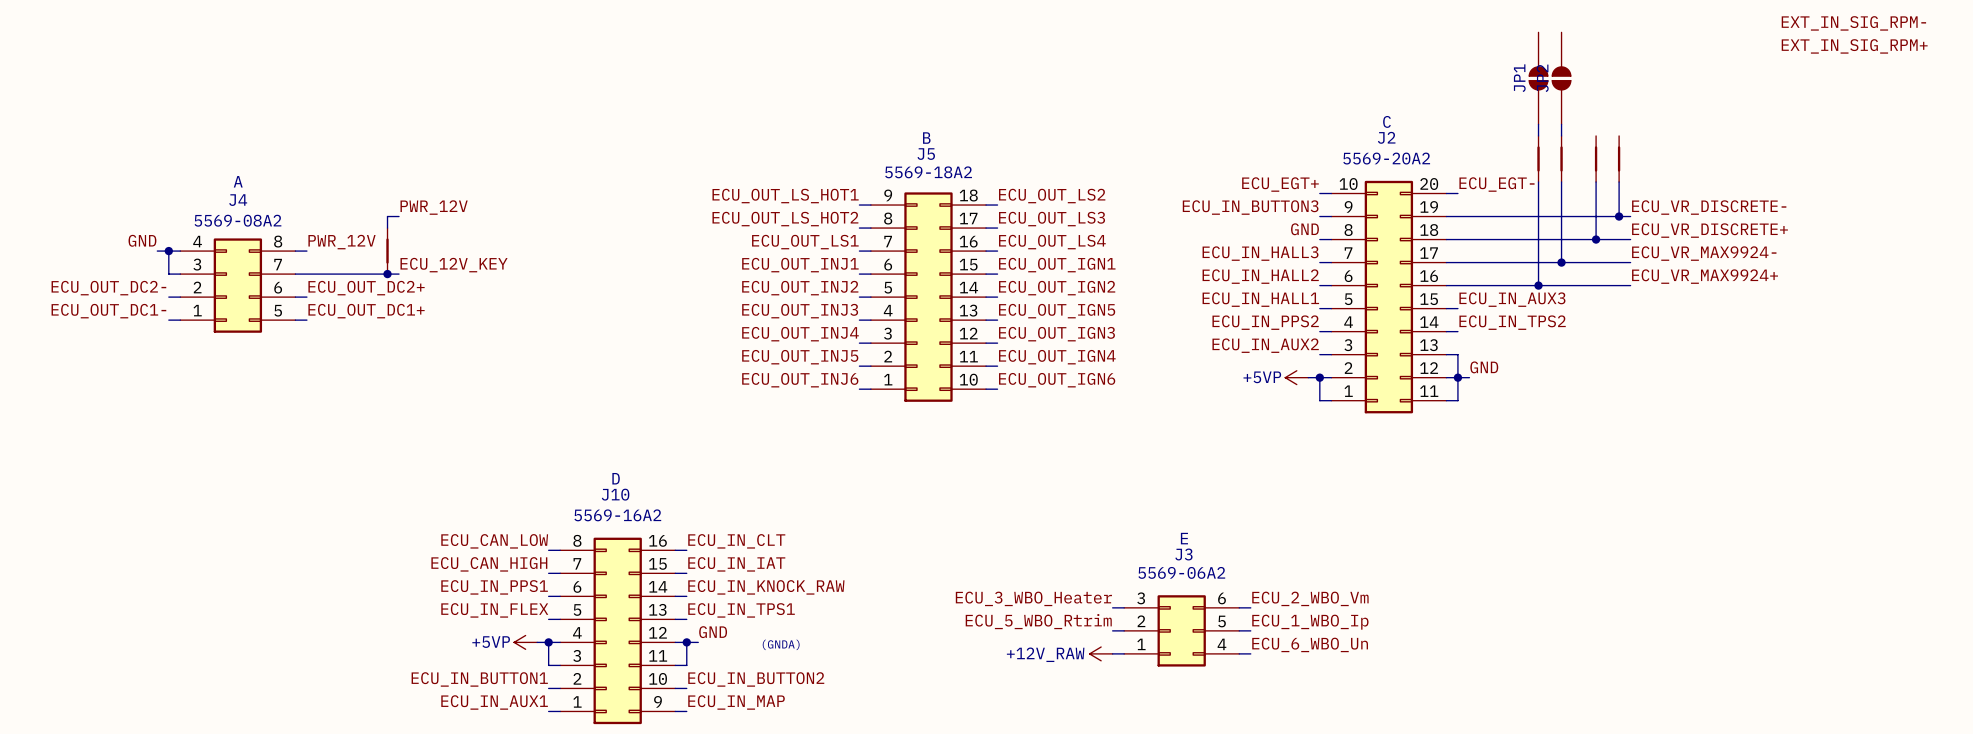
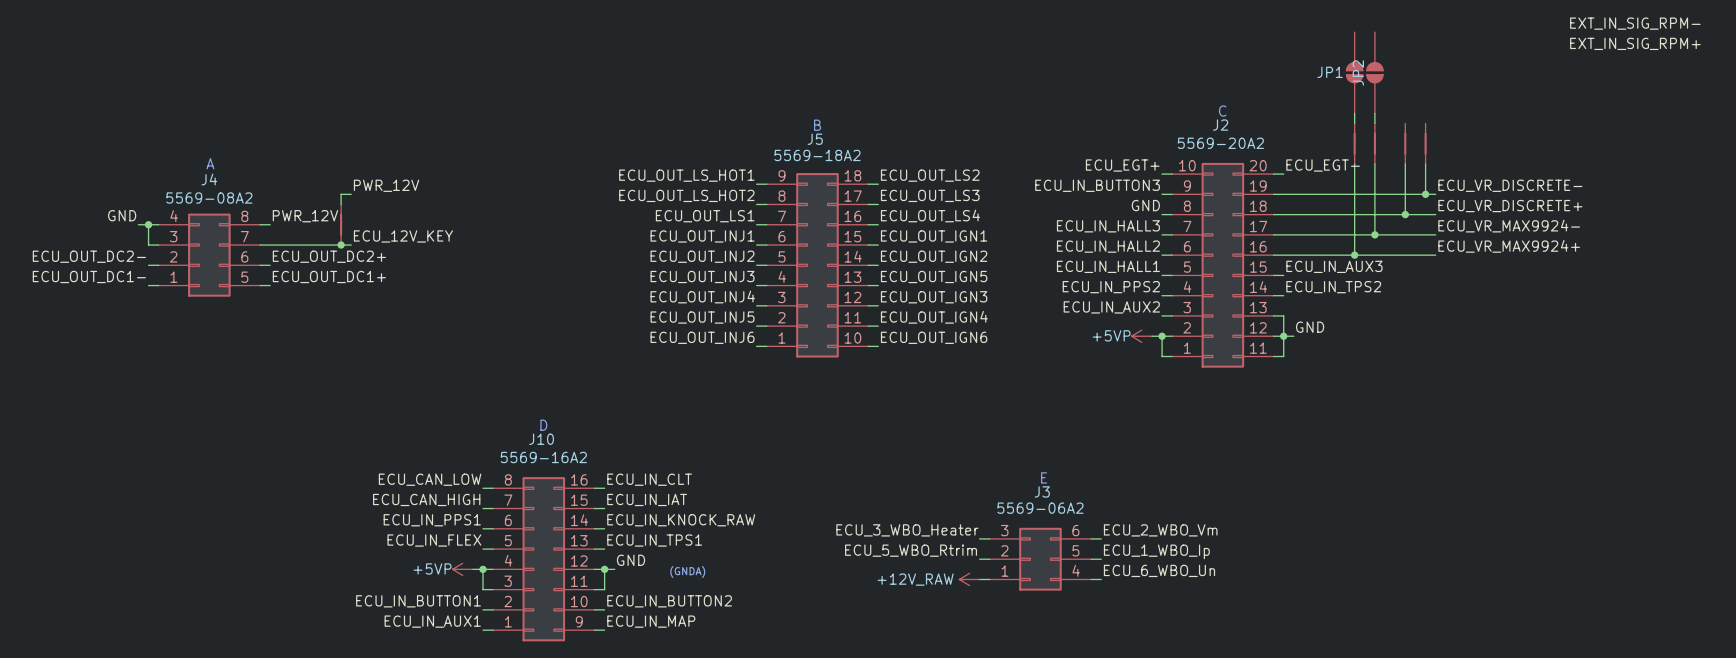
JP1 name rotation: 0° (1519, 78) -> 90° clockwise (1330, 72)

